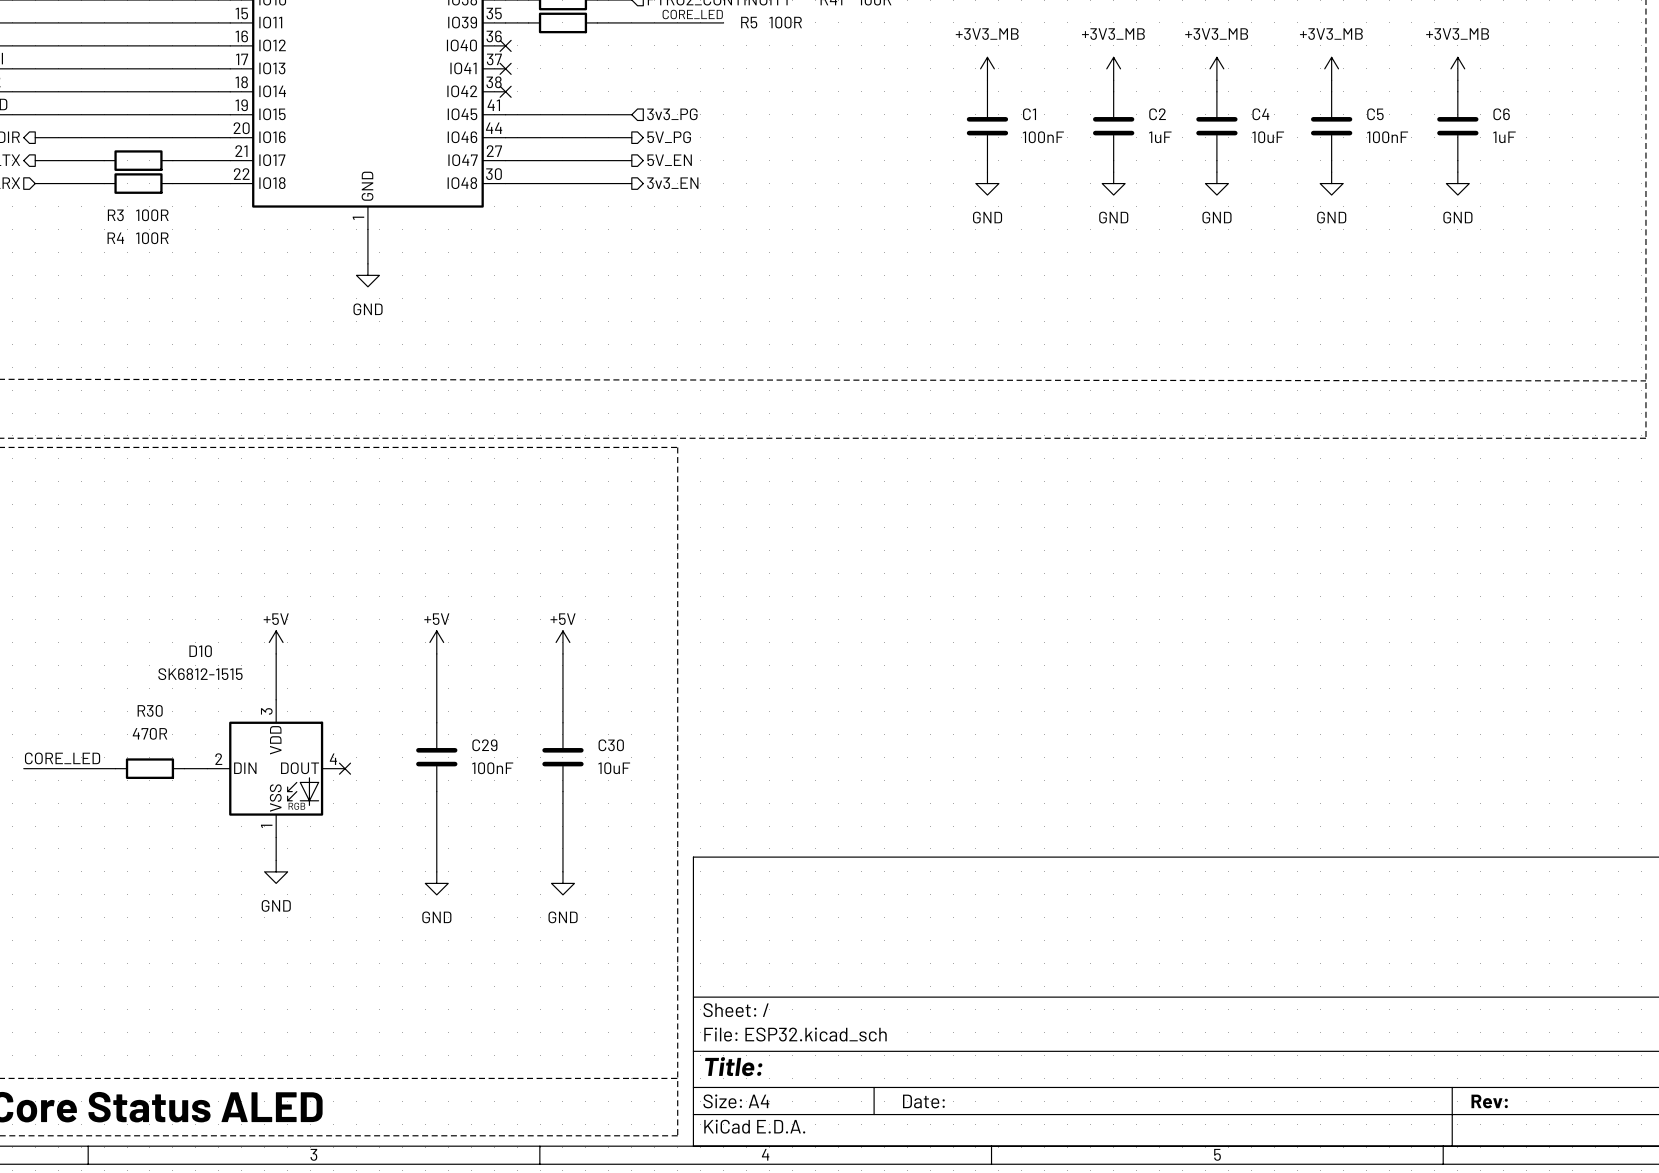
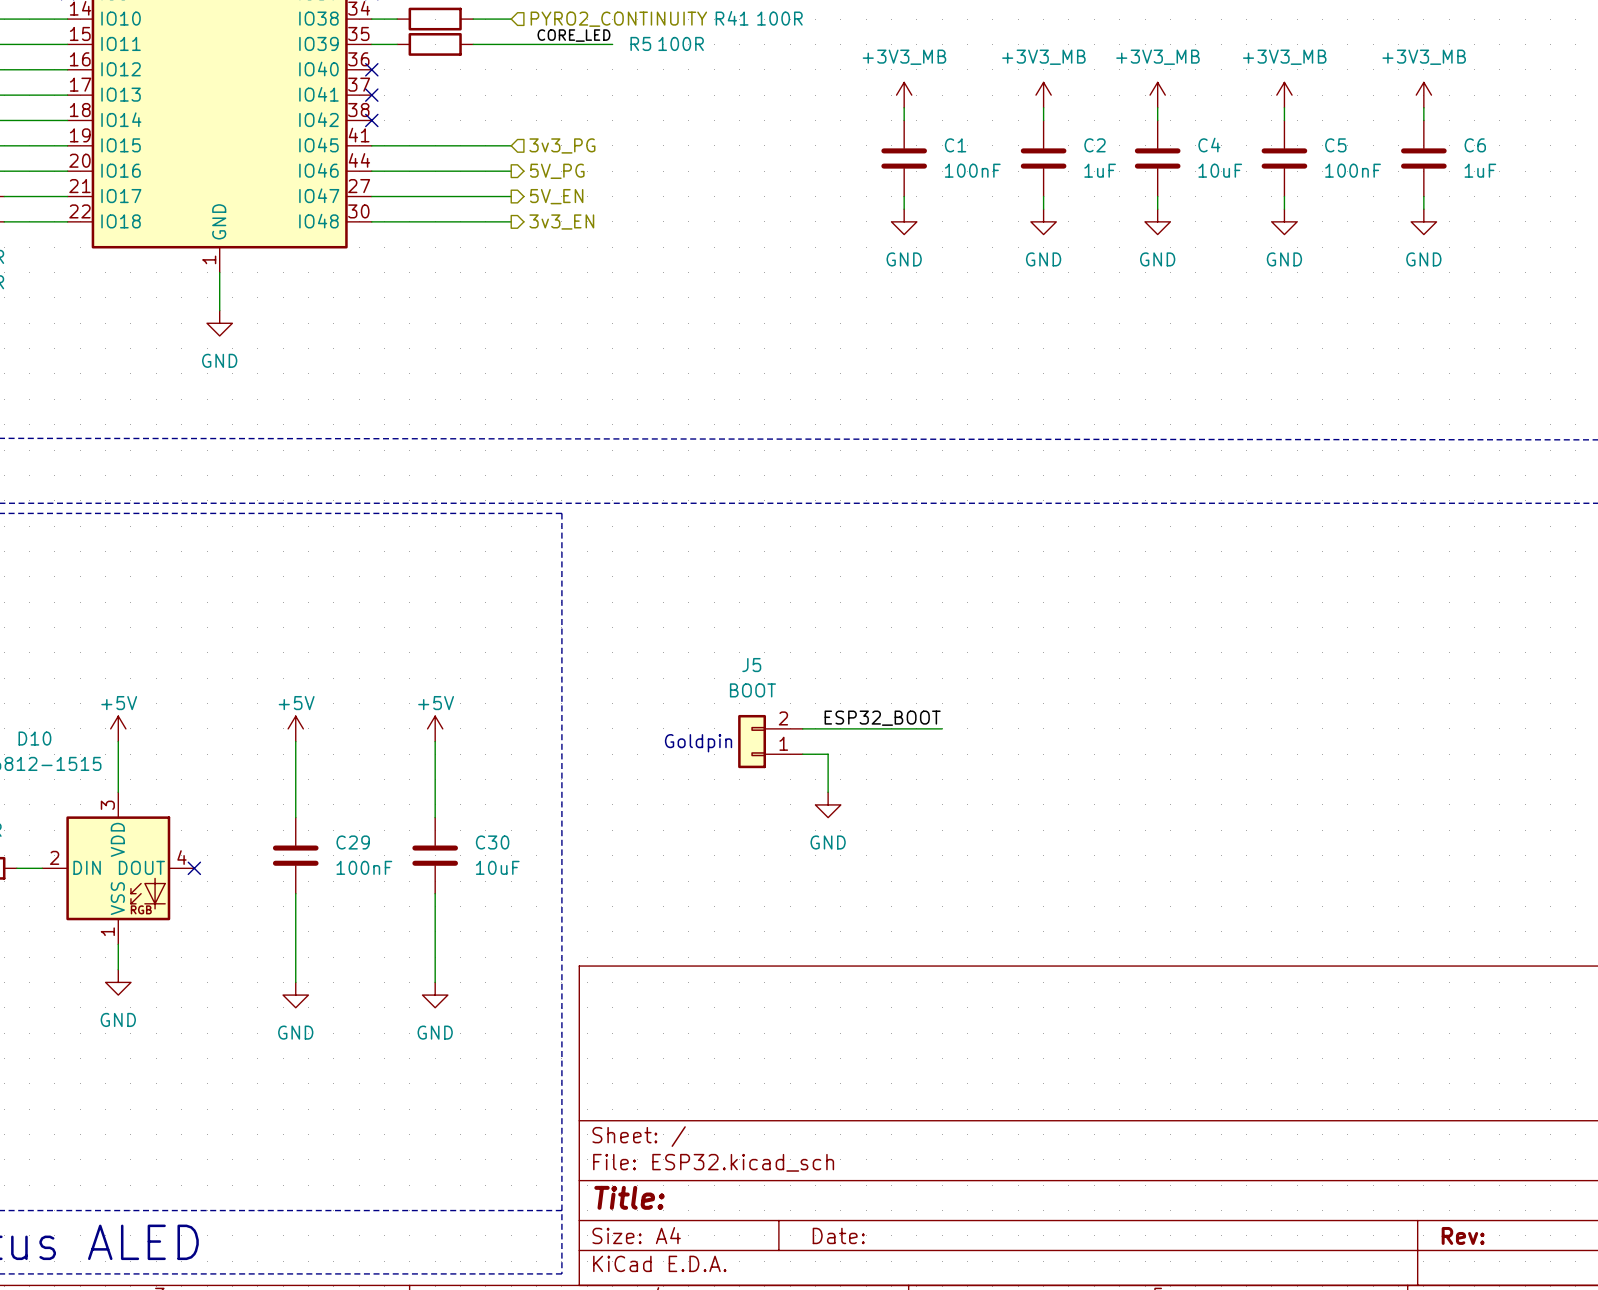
label: none -> ESP32_BOOT (882, 718)
wire: none -> (802, 728) (942, 728)
J5: none -> BOOT (770, 741)
text: none -> Goldpin (698, 743)
wire: none -> (802, 754) (828, 754) (828, 792)
power symbol: none -> GND (828, 804)

